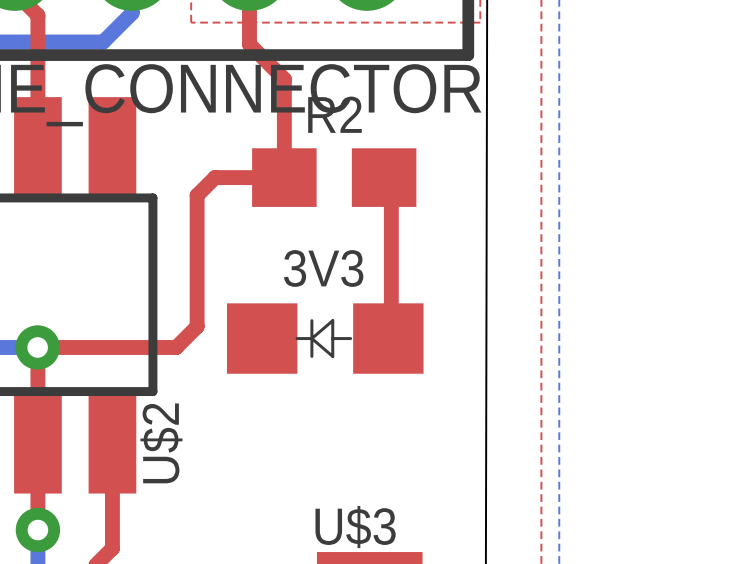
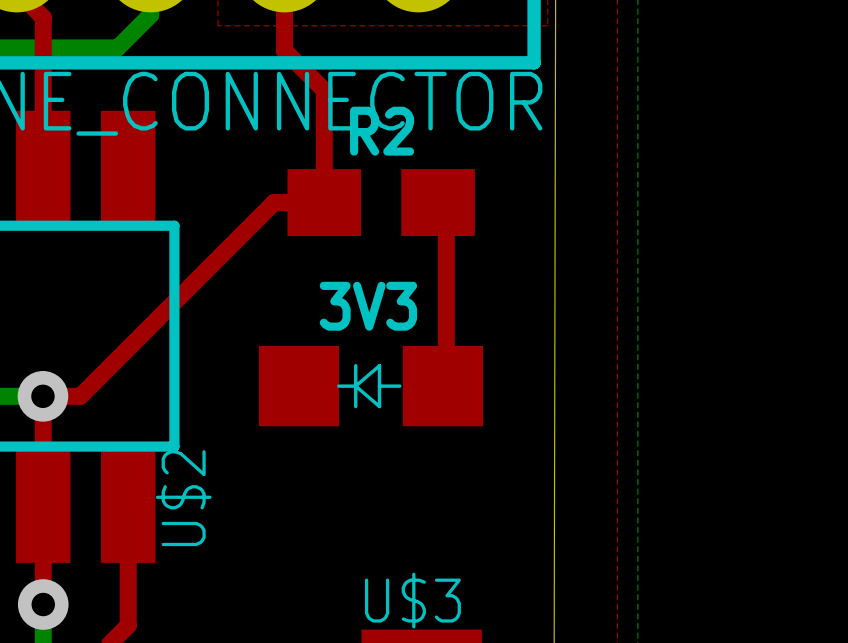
top track: (240, 177) (215, 177) (197, 195) (197, 326) (176, 347) (70, 347) -> (274, 202) (80, 396)

